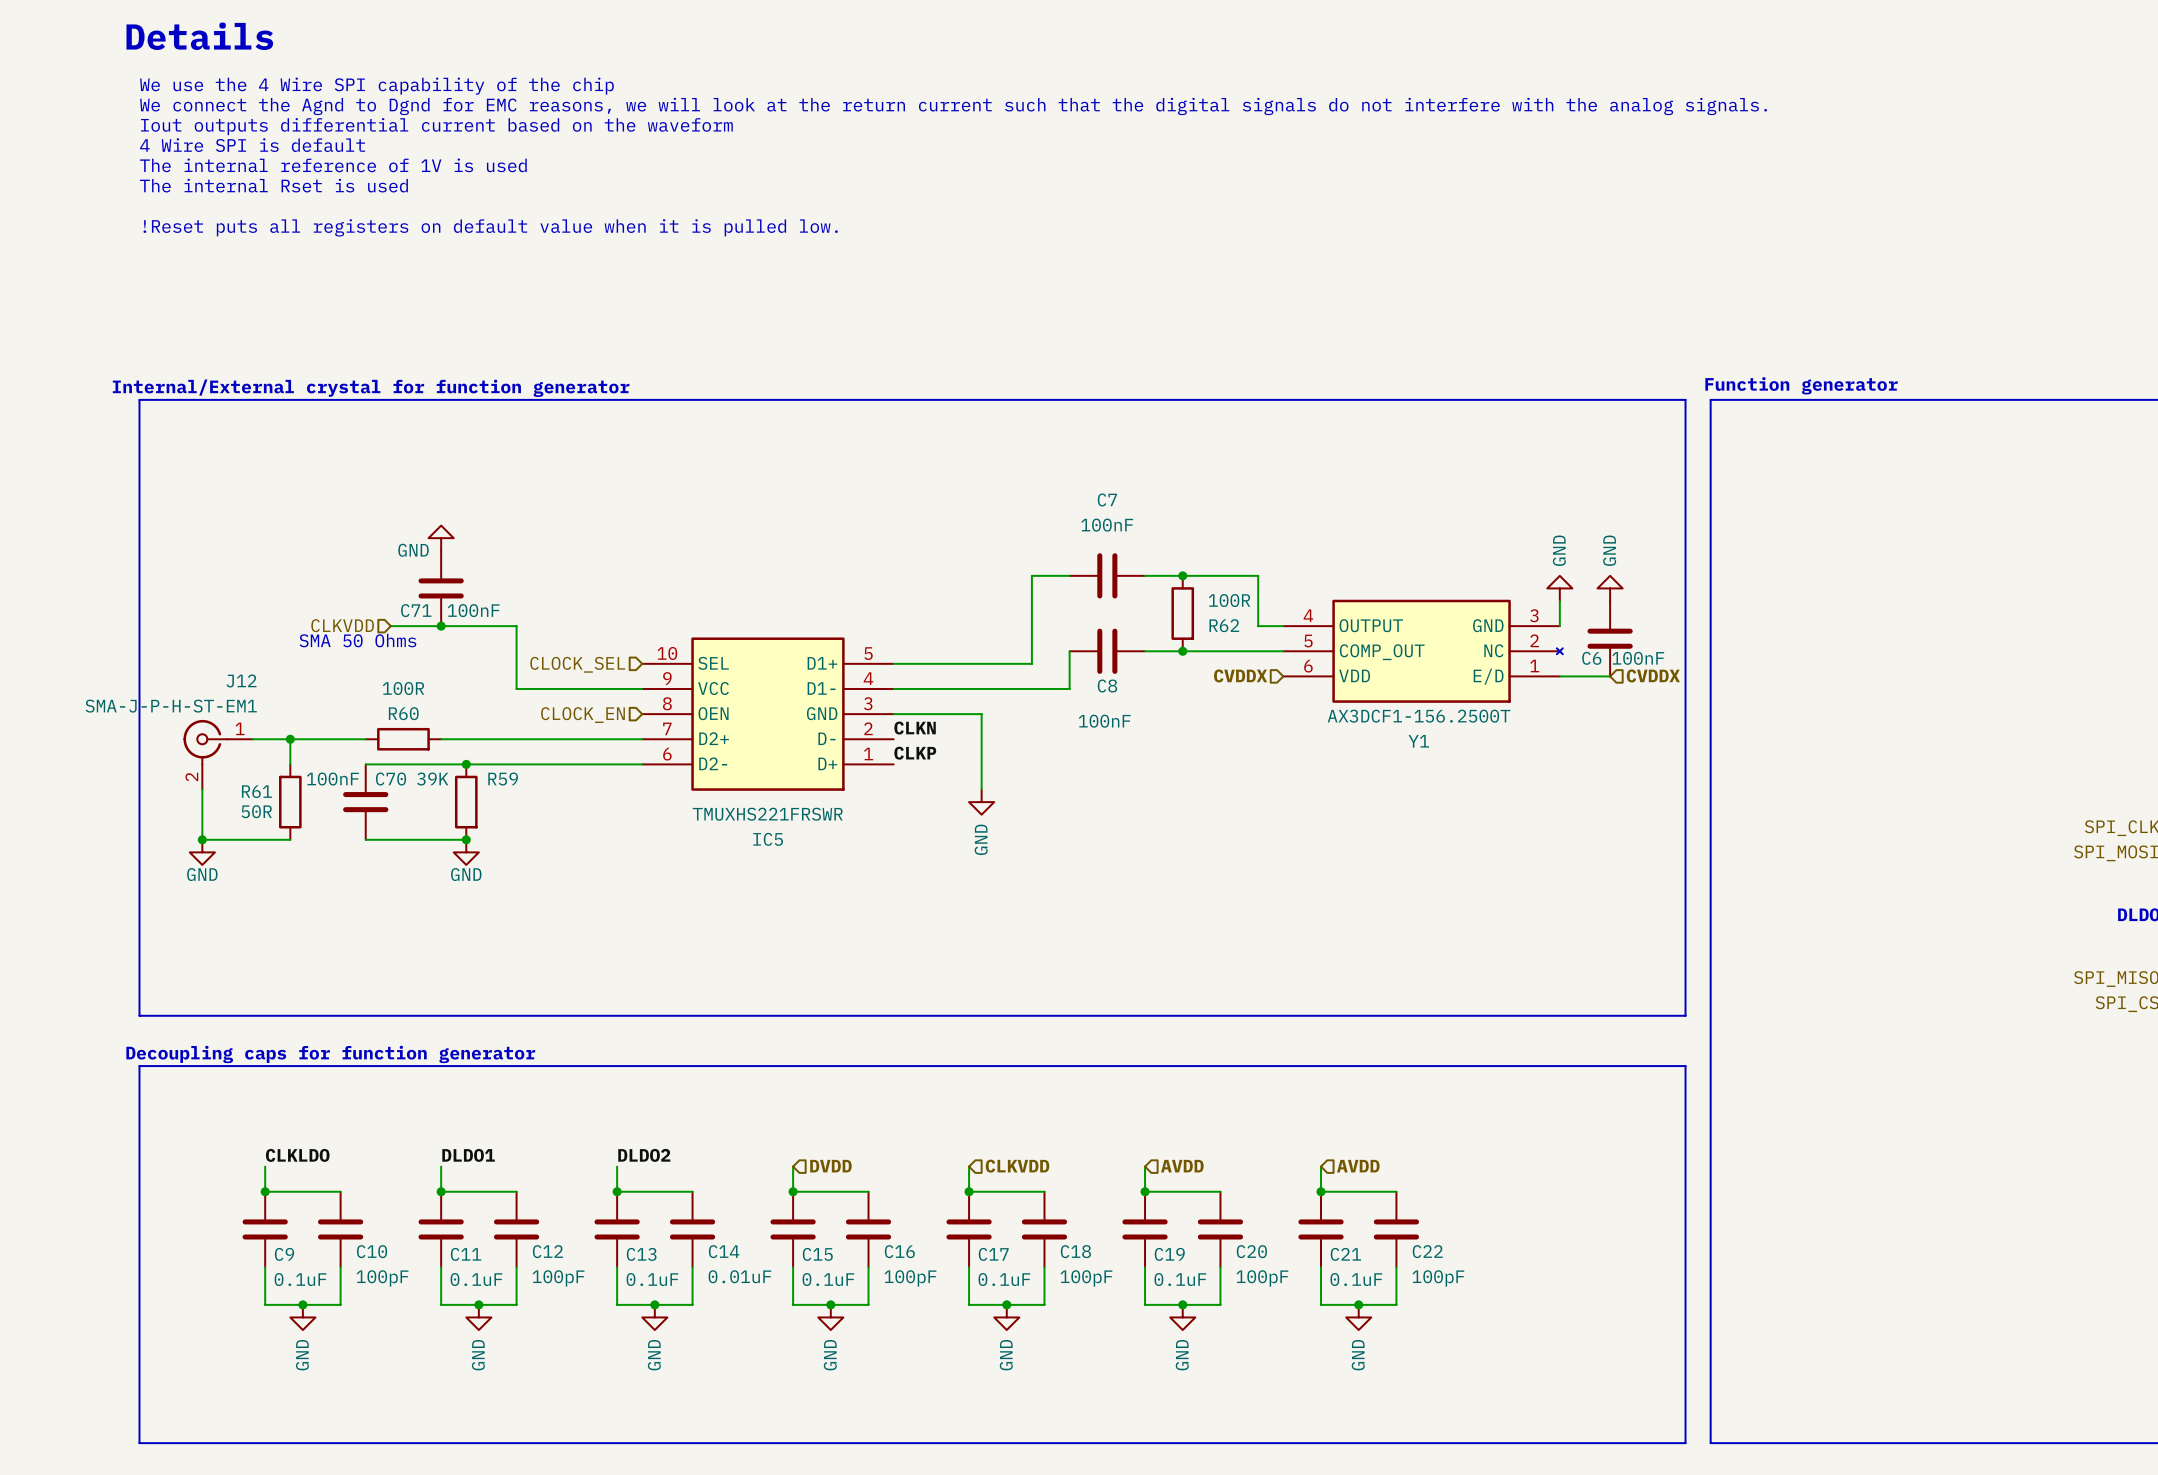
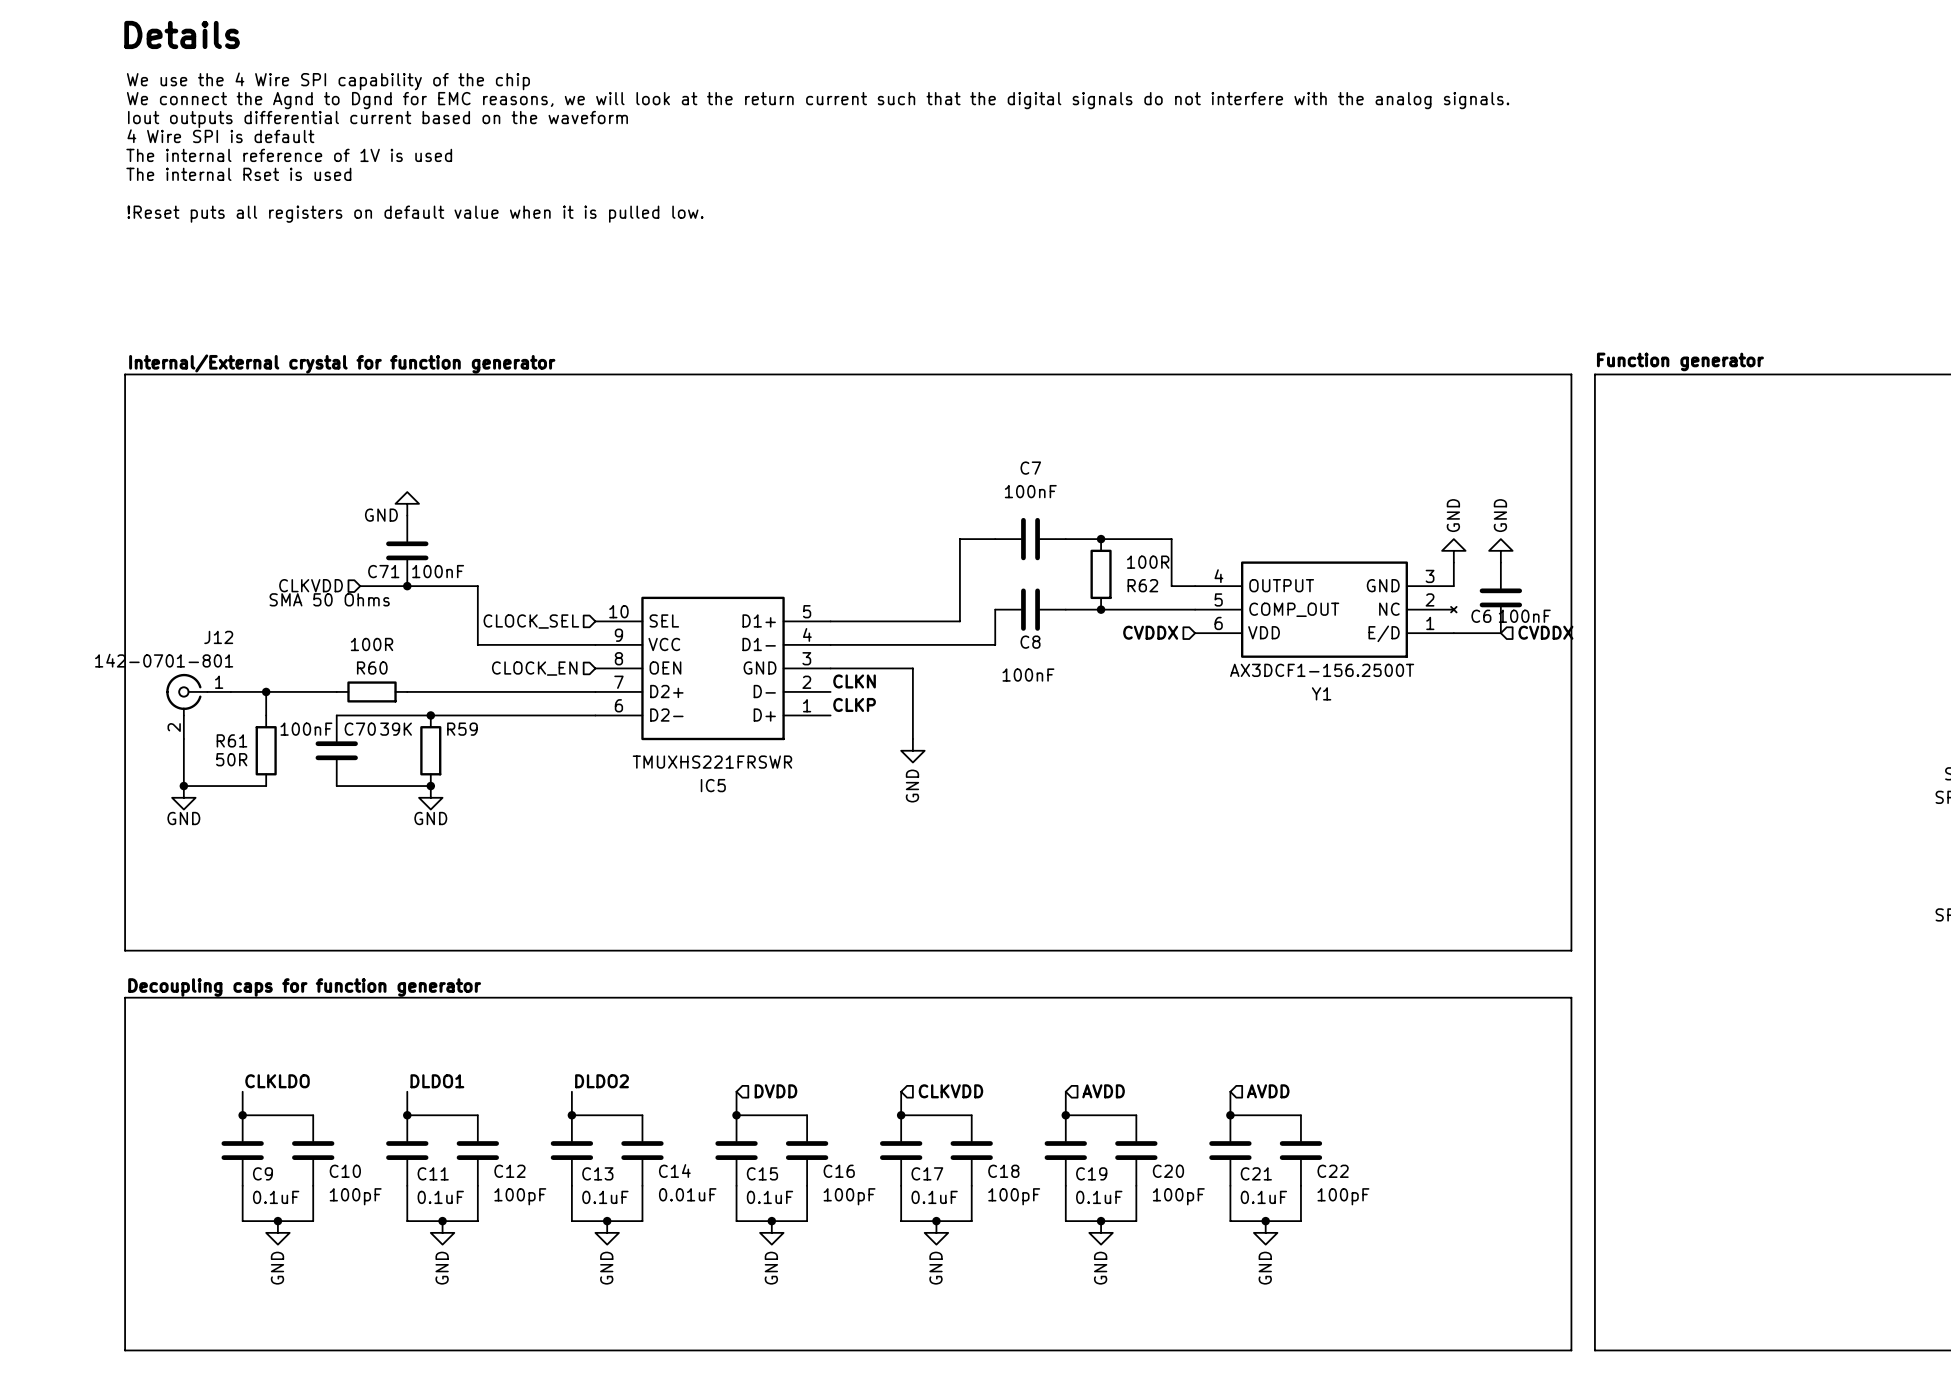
J12 value: SMA-J-P-H-ST-EM1 (171, 706) -> 142-0701-801 (164, 660)

